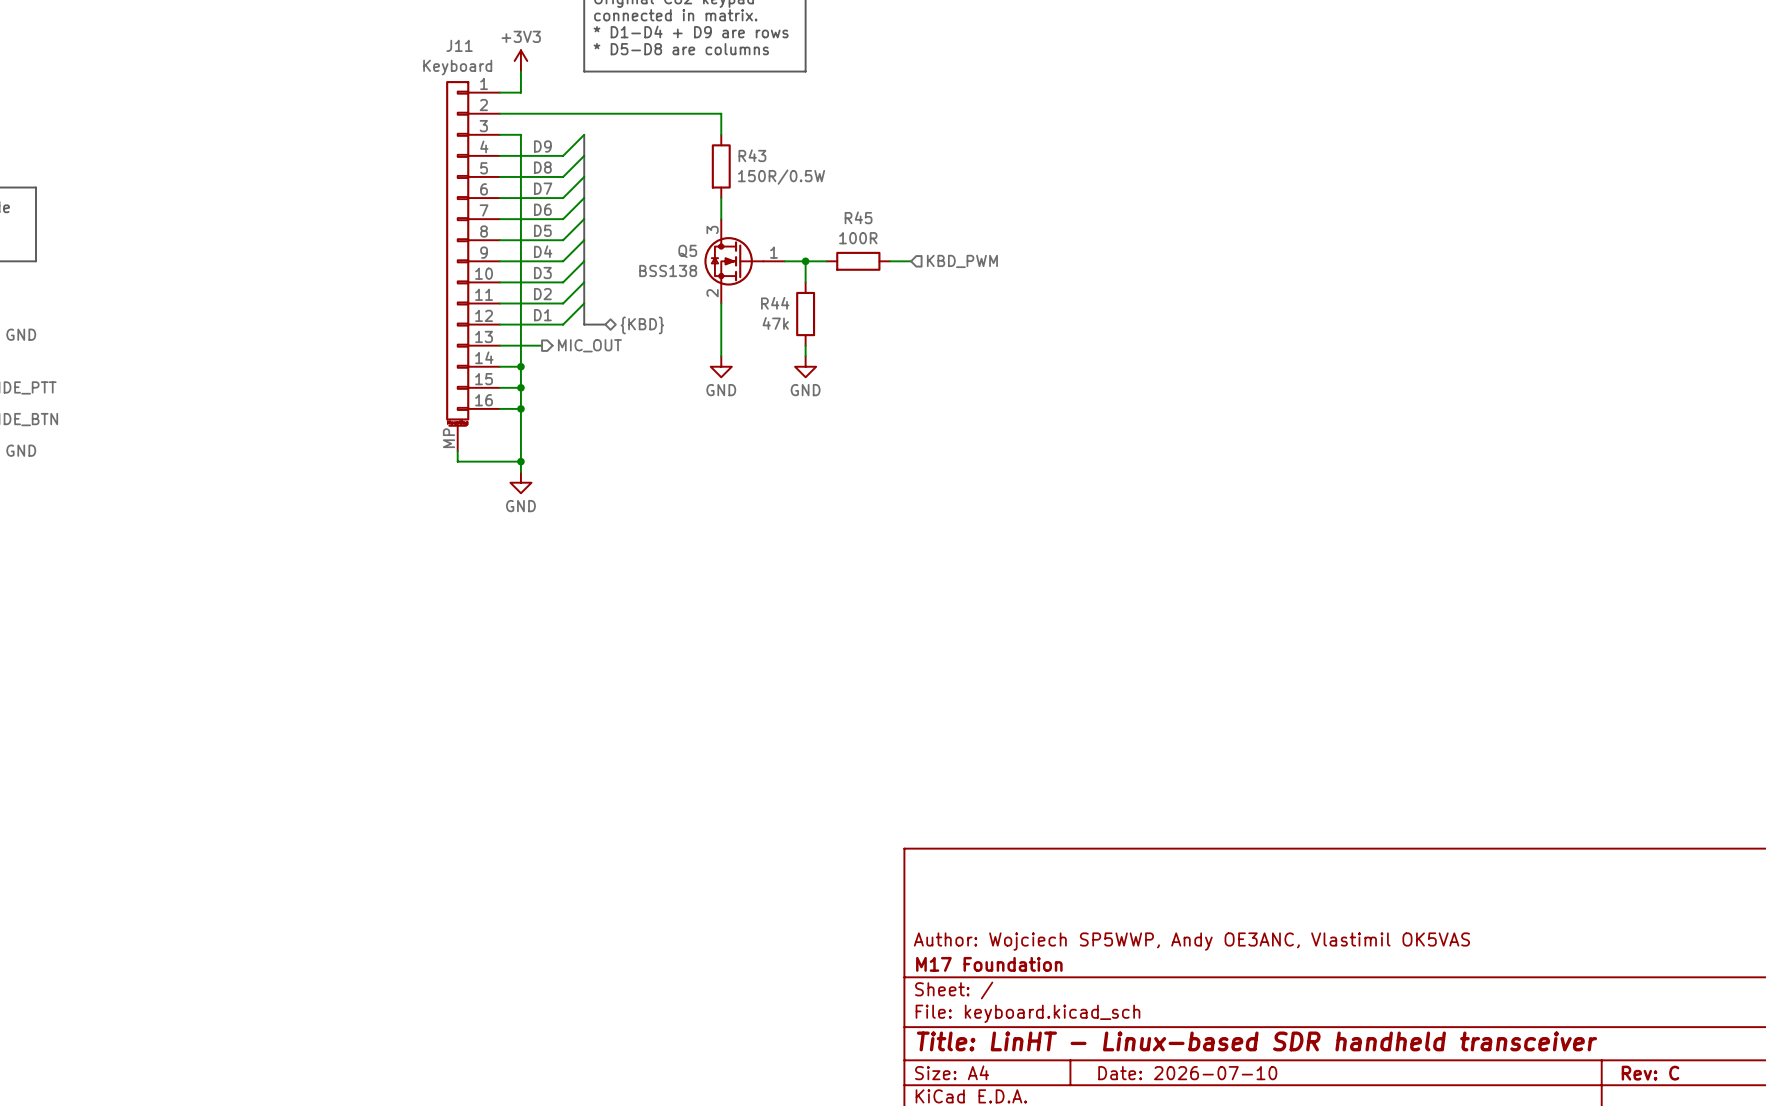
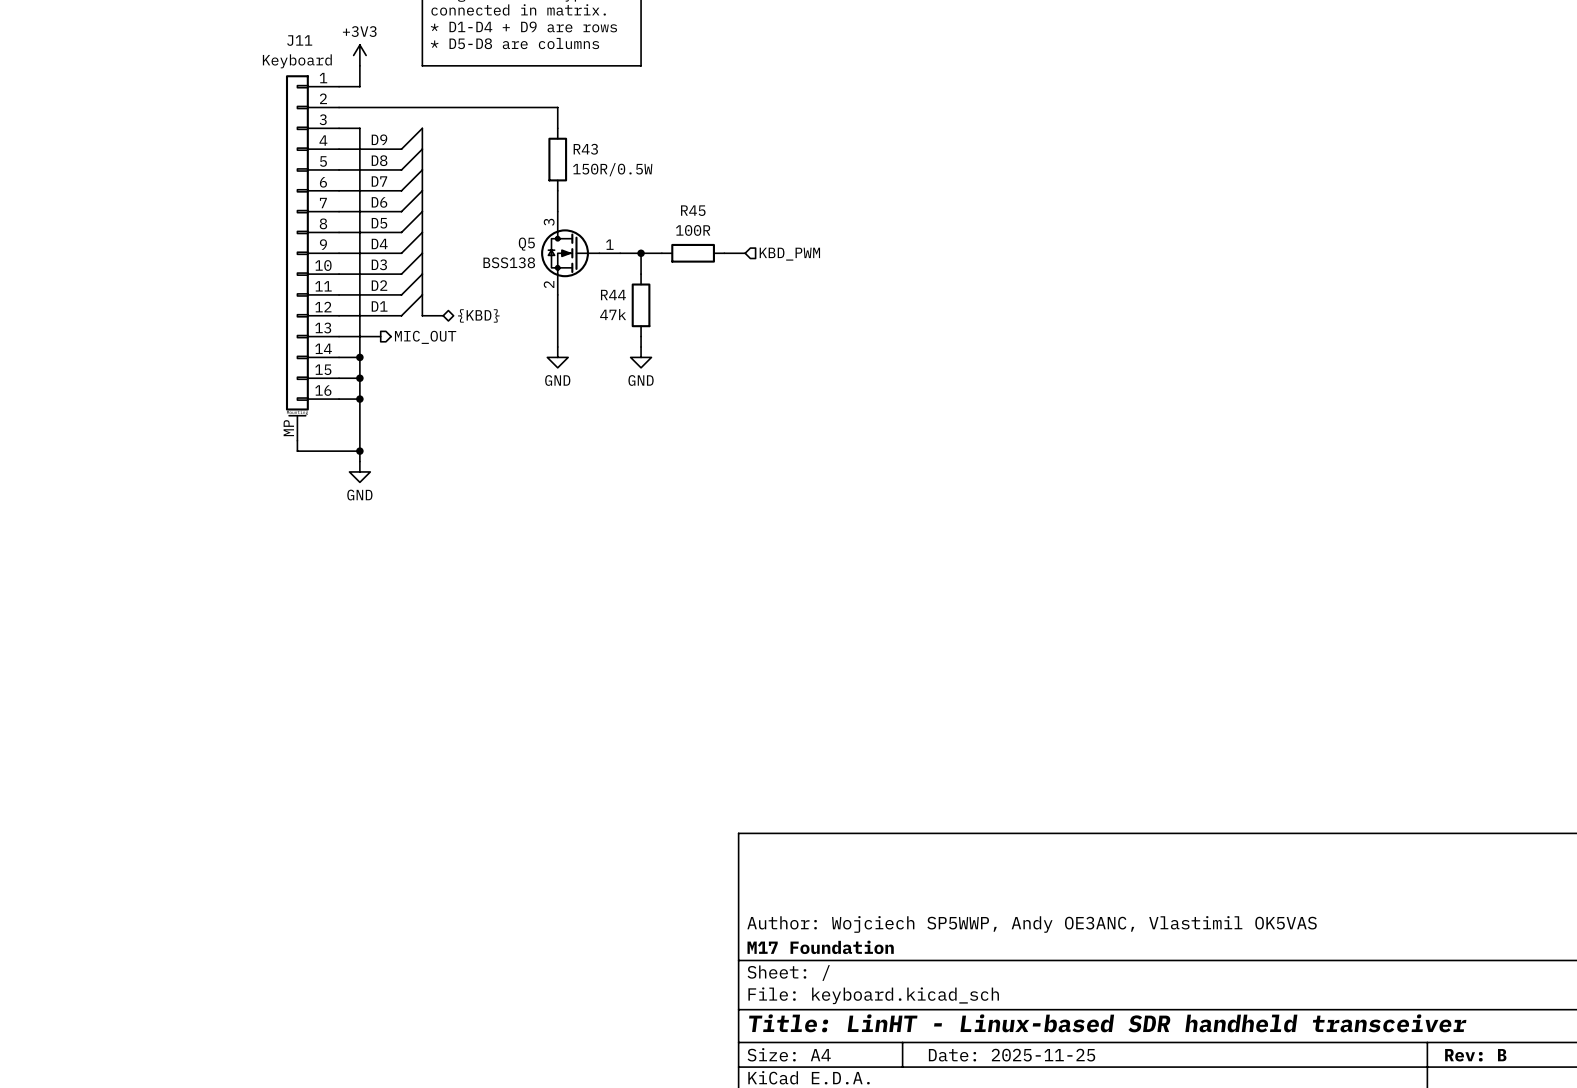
title block: Date: 2026-07-10 (1187, 1073) -> Date: 2025-11-25 (1012, 1055)
title block: Rev: C (1650, 1073) -> Rev: B (1475, 1055)

